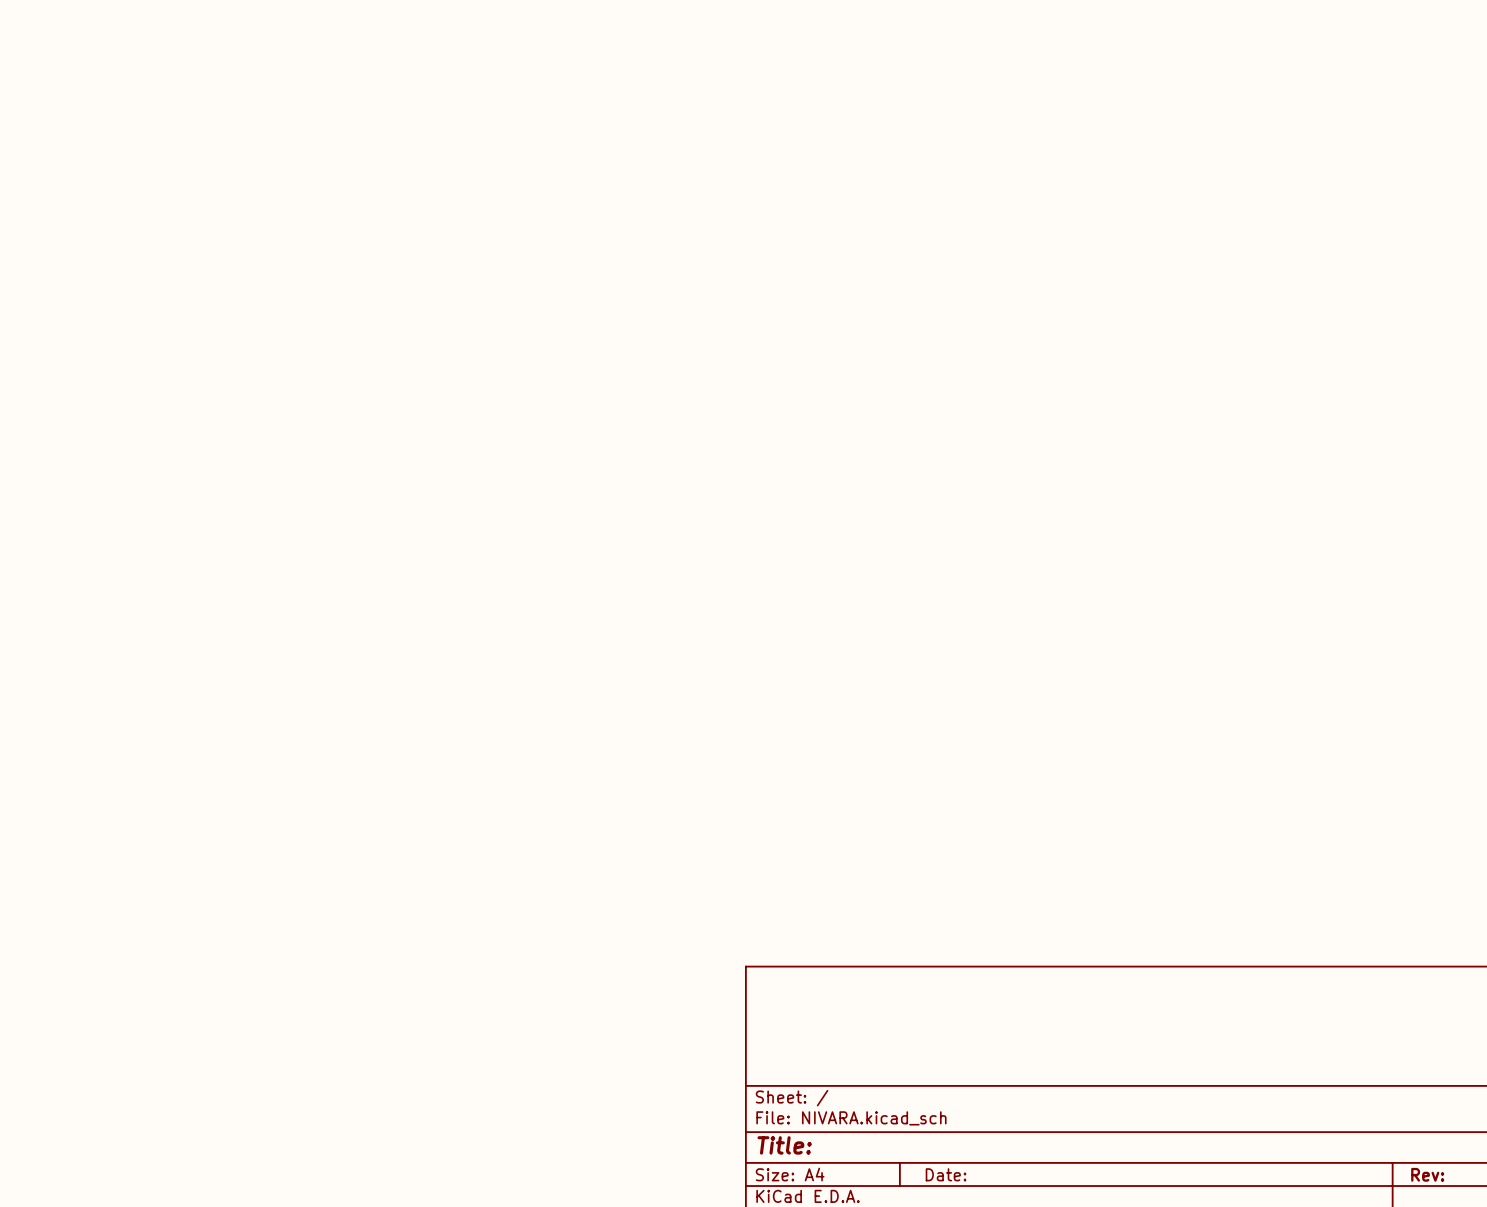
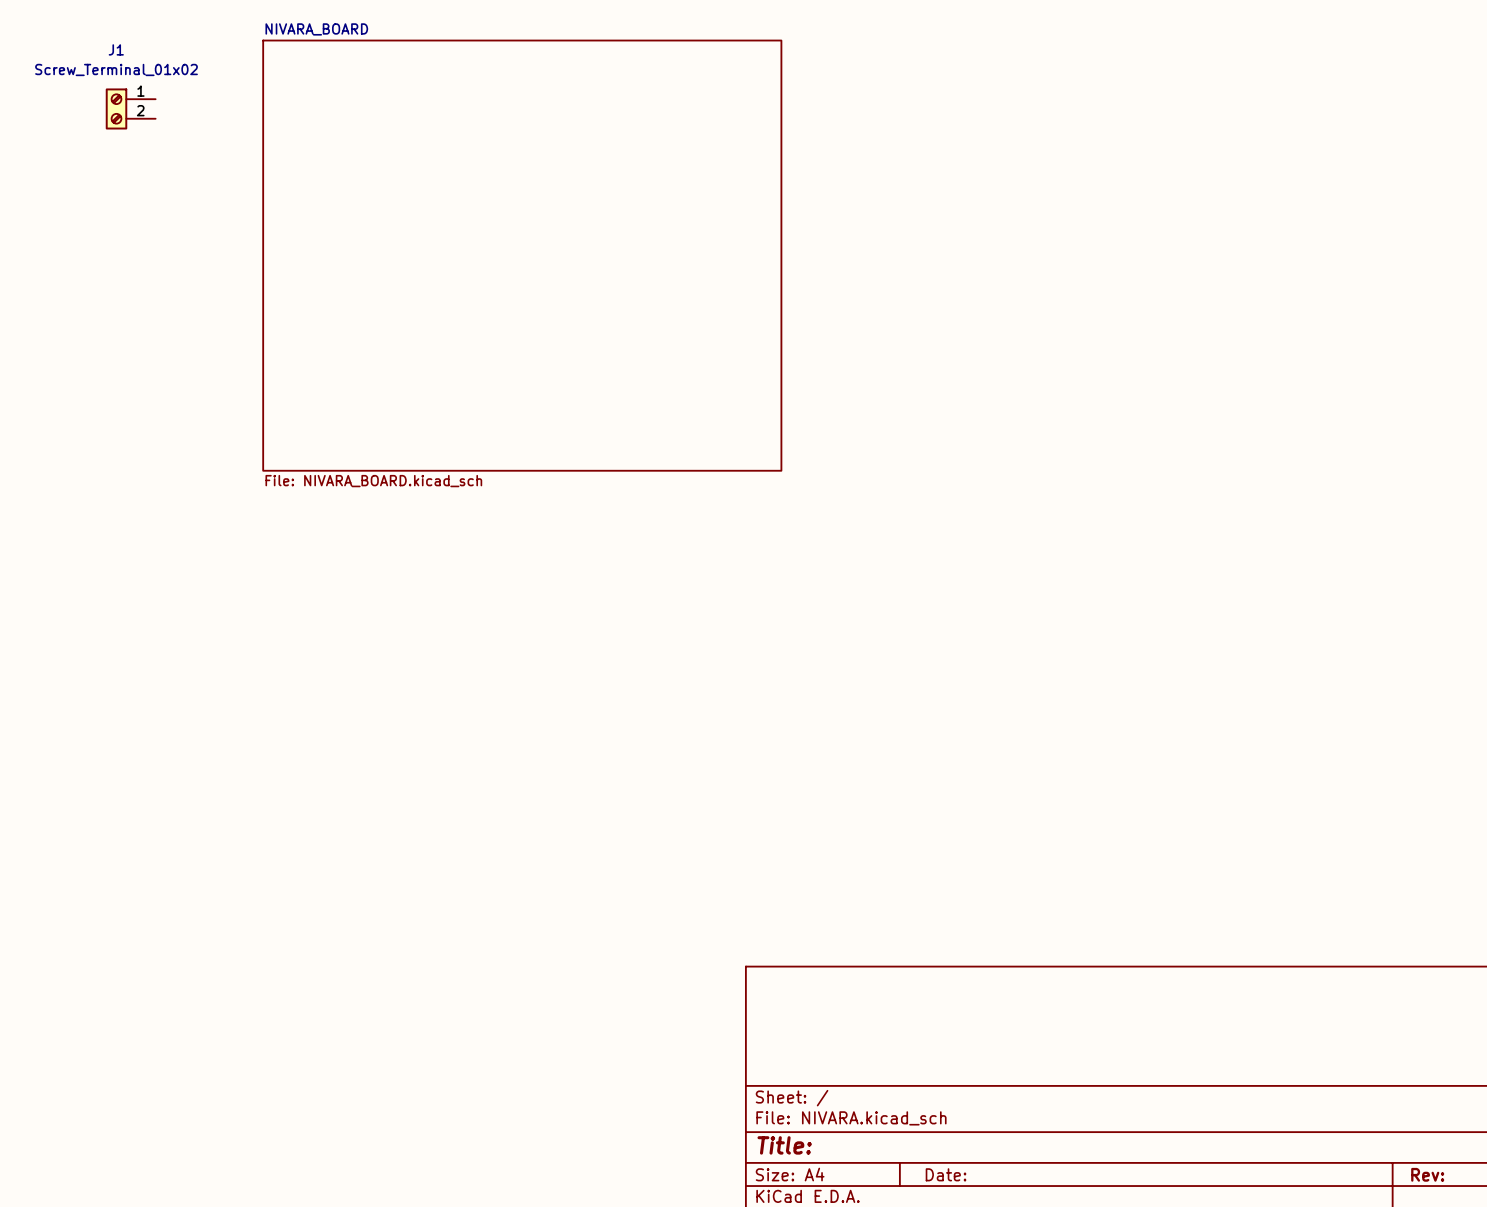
J1: none -> Screw_Terminal_01x02 (130, 108)
sheet NIVARA_BOARD: none -> File: NIVARA_BOARD.kicad_sch (522, 255)

